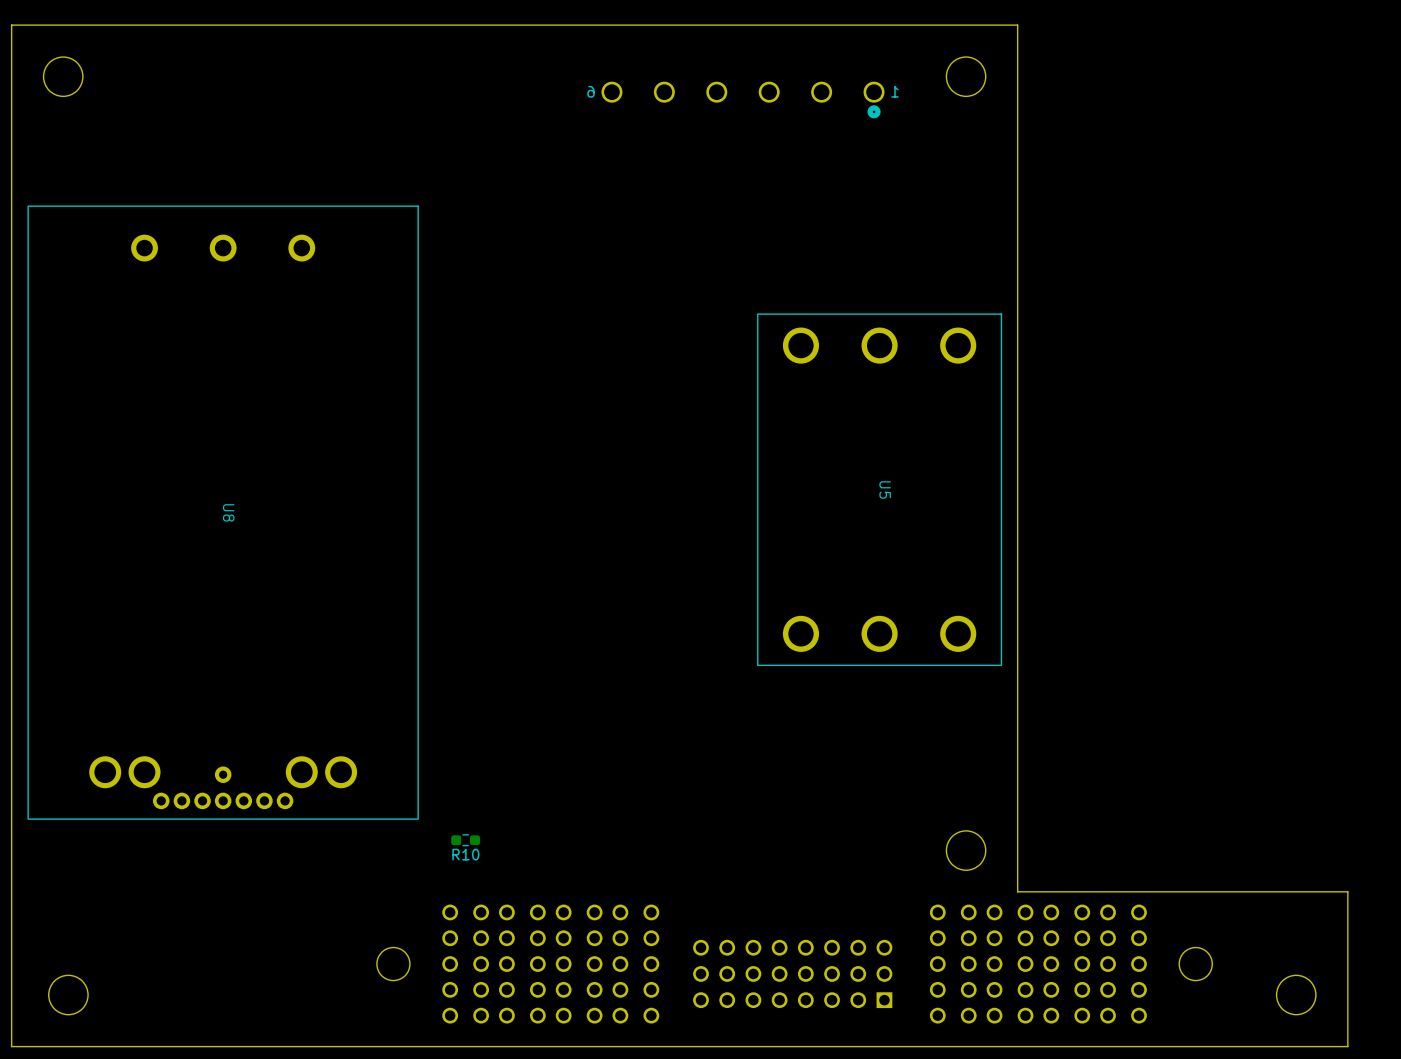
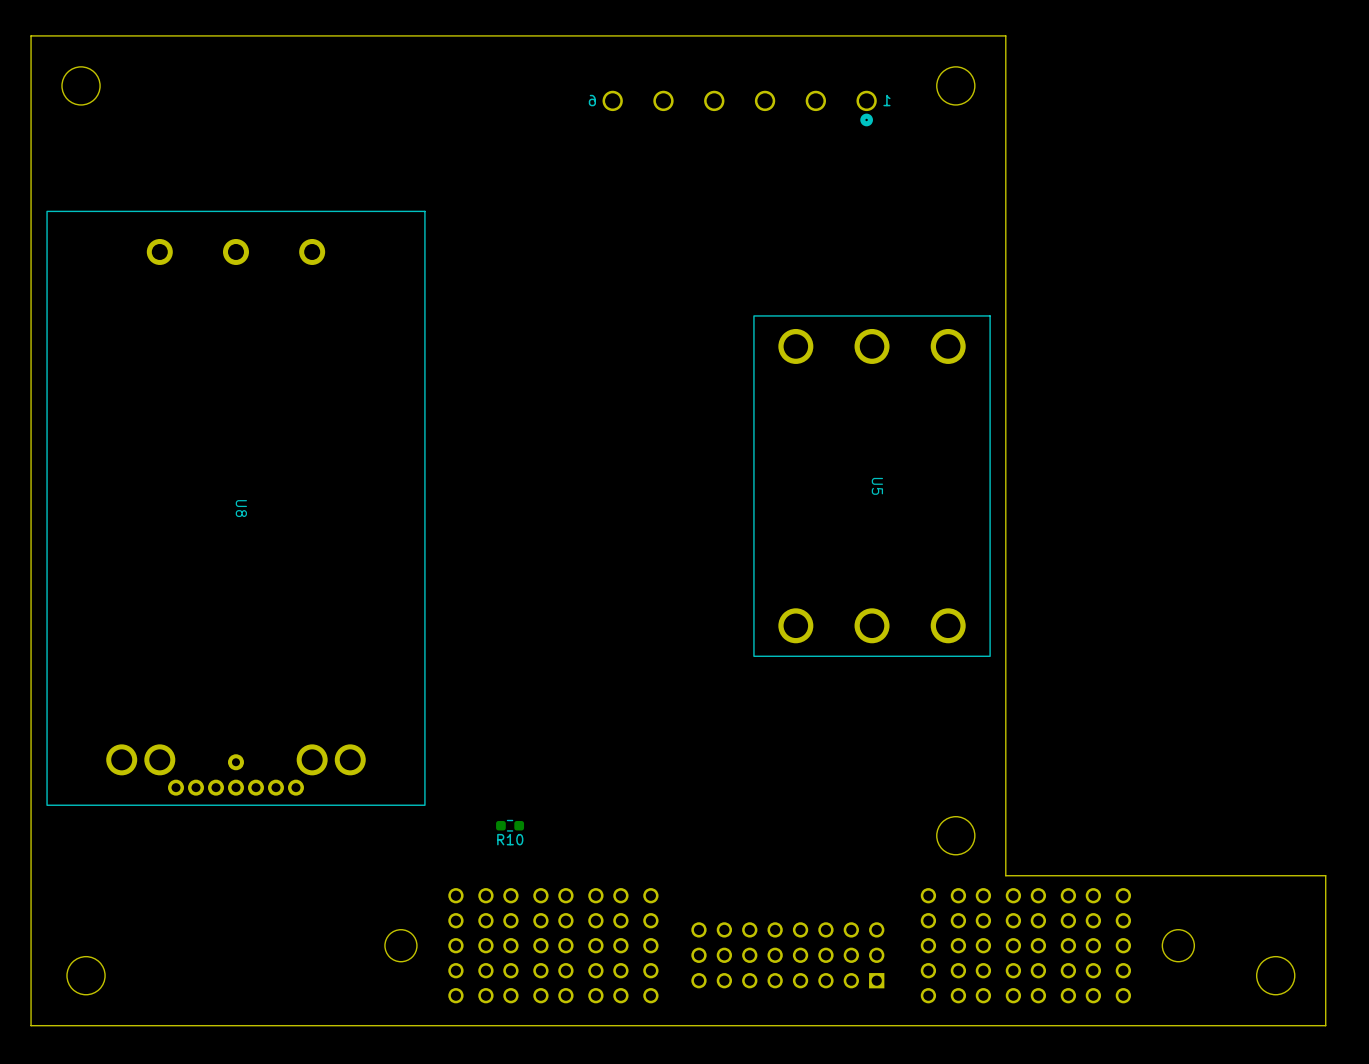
R10 position: (465, 840) -> (510, 825)

